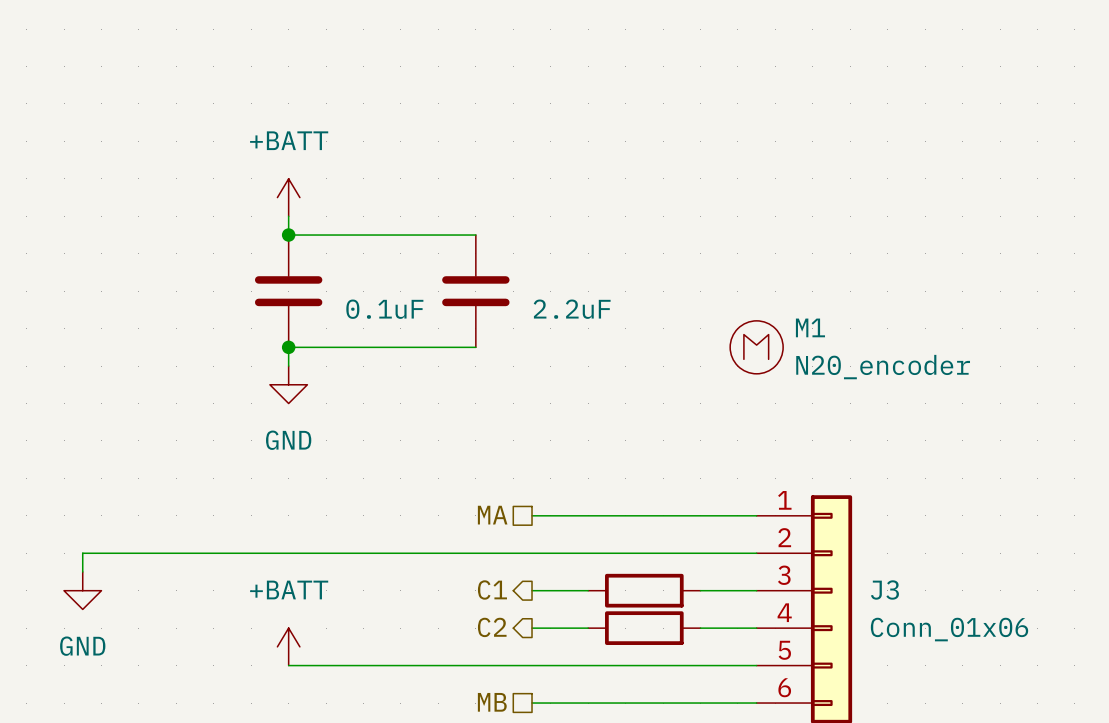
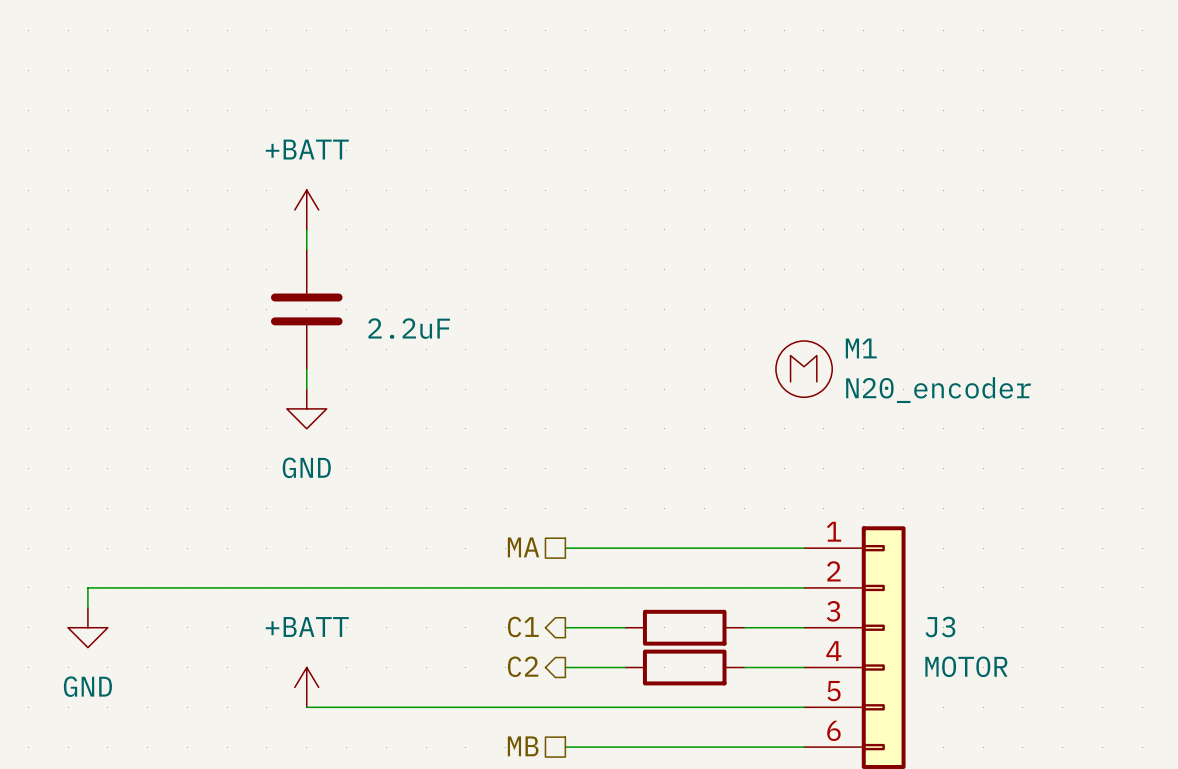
wire: (288, 235) (475, 235) -> none
junction: (288, 235) -> none
part: 2.2uF (475, 291) -> none
part value: 0.1uF (384, 309) -> 2.2uF (409, 328)
wire: (288, 347) (475, 347) -> none
junction: (288, 347) -> none
J3 value: Conn_01x06 (949, 629) -> MOTOR (966, 666)

